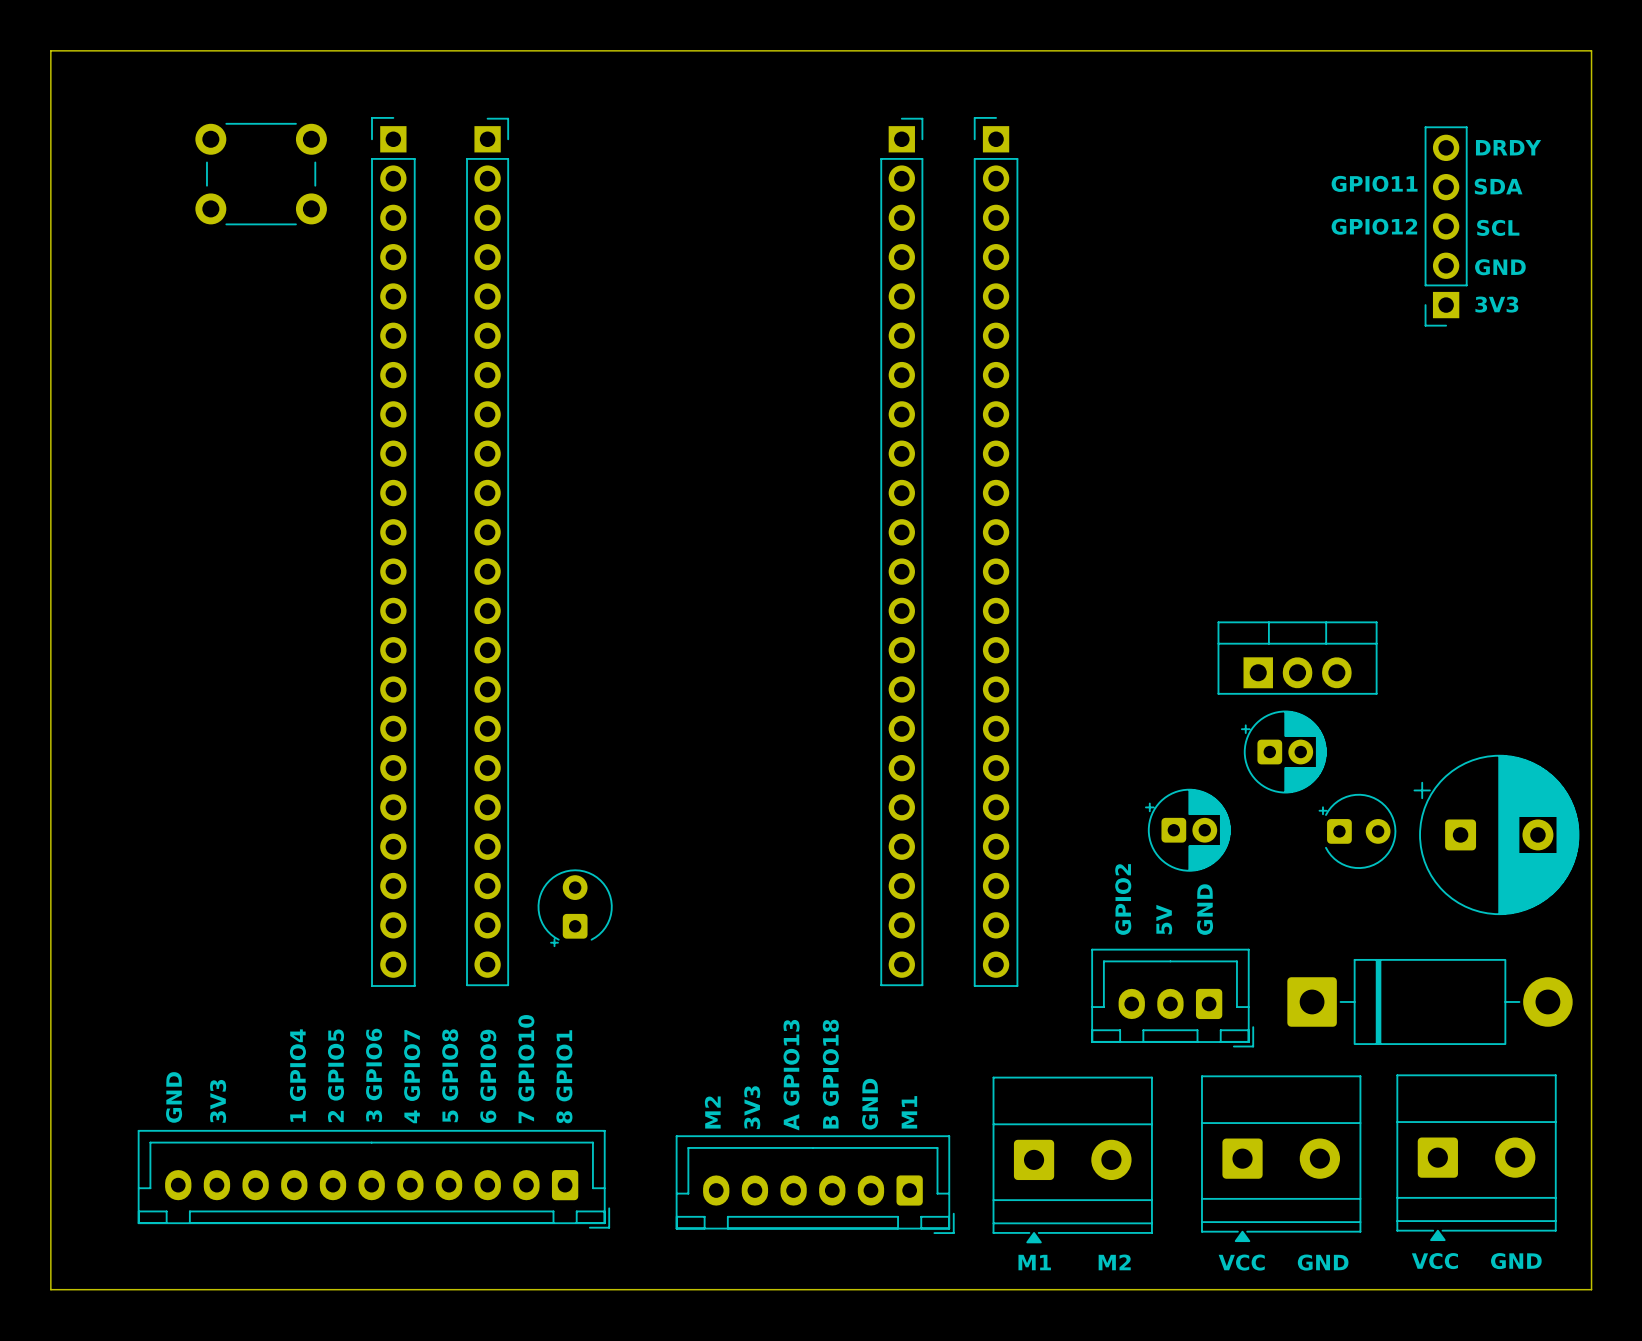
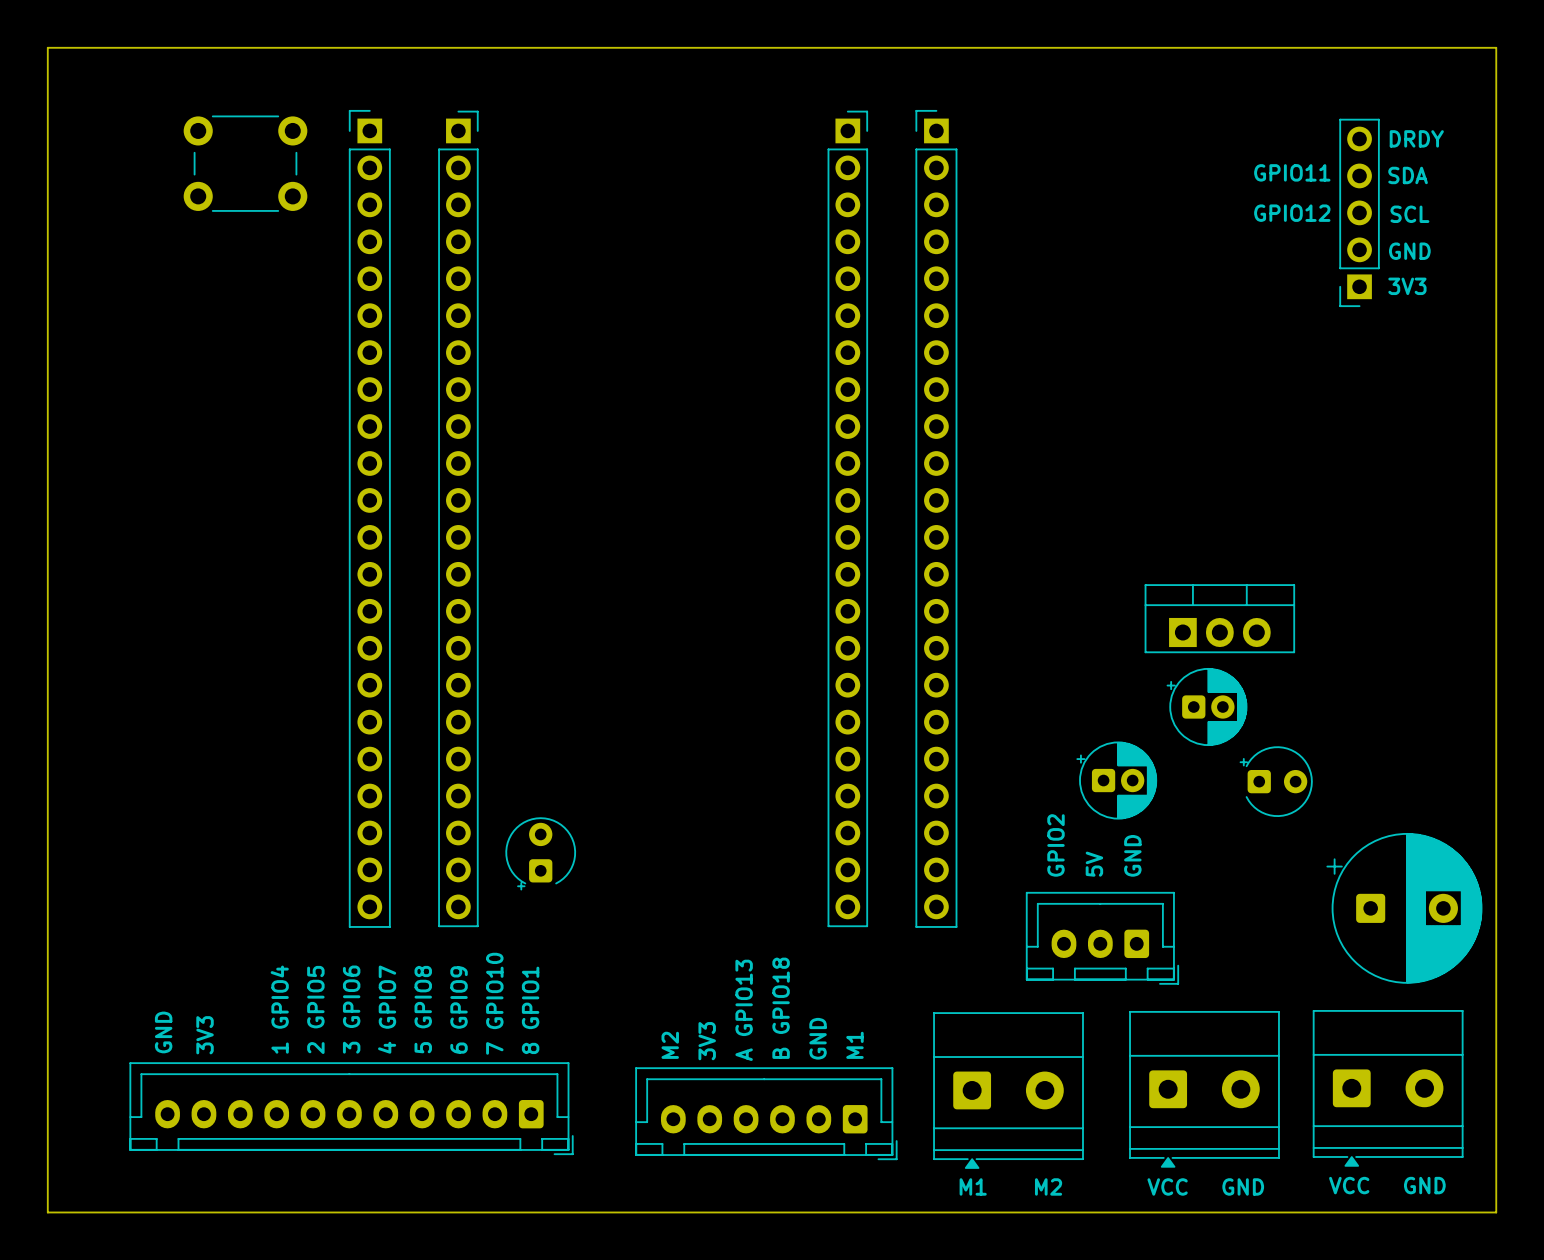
part position: (1496, 834) -> (1404, 908)
part: (1430, 1001) -> none

